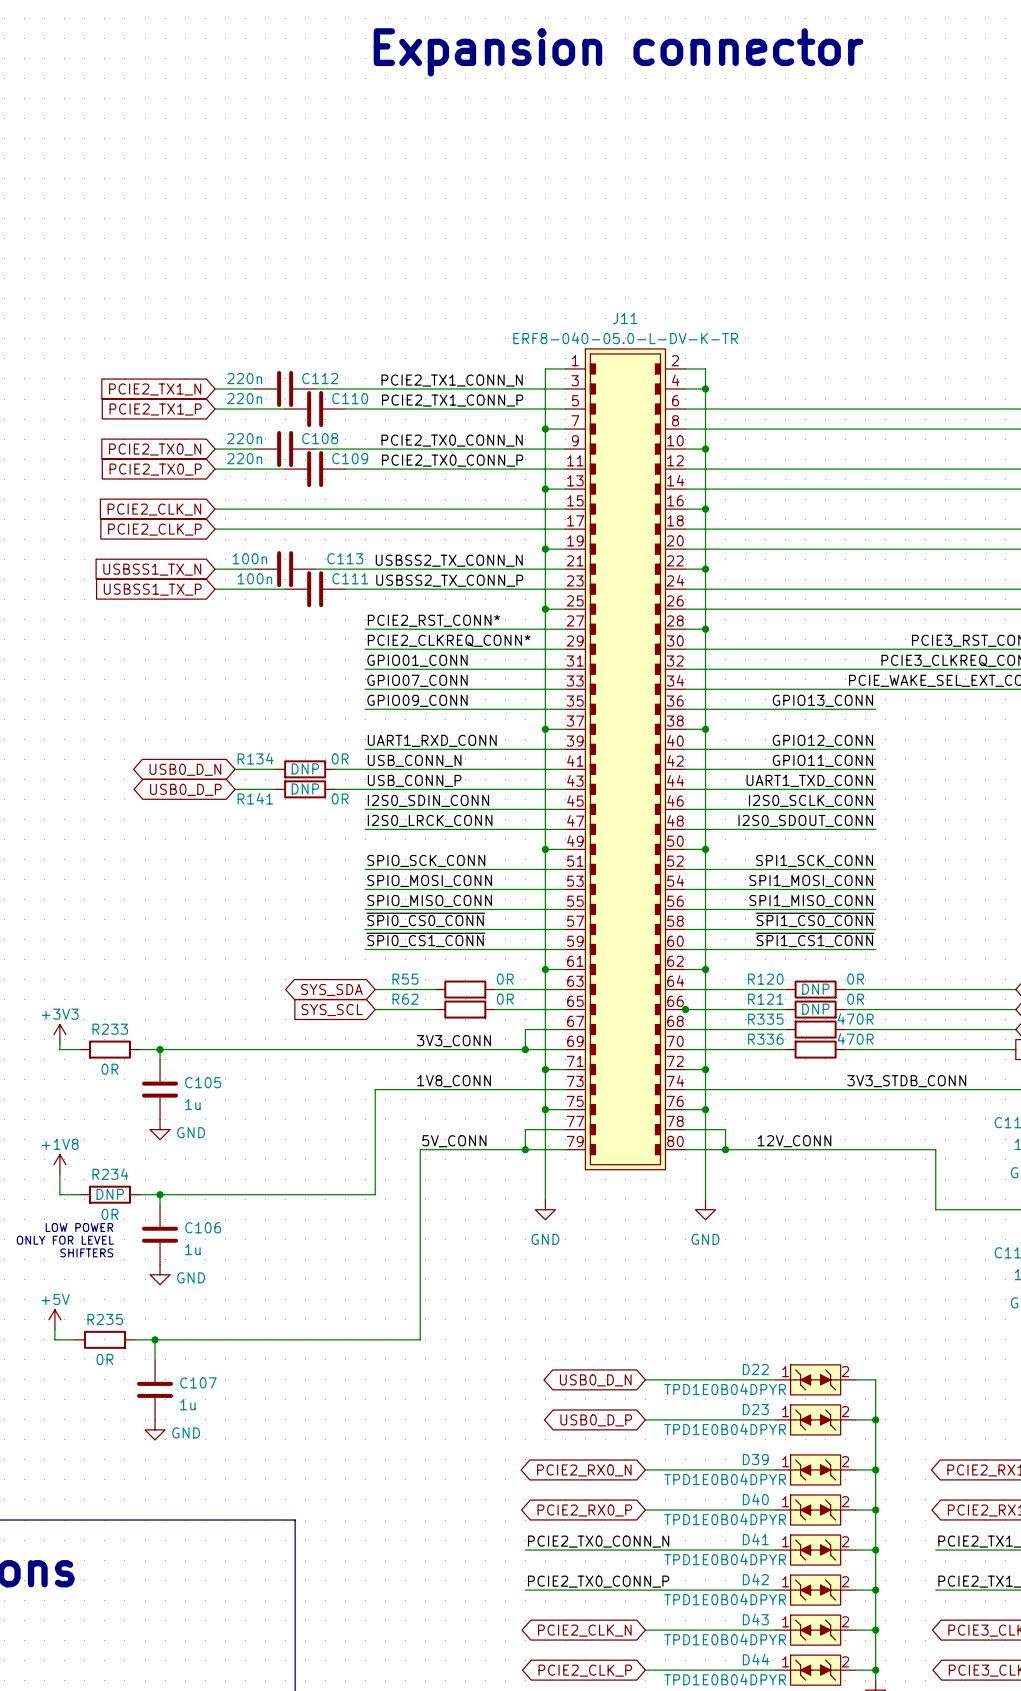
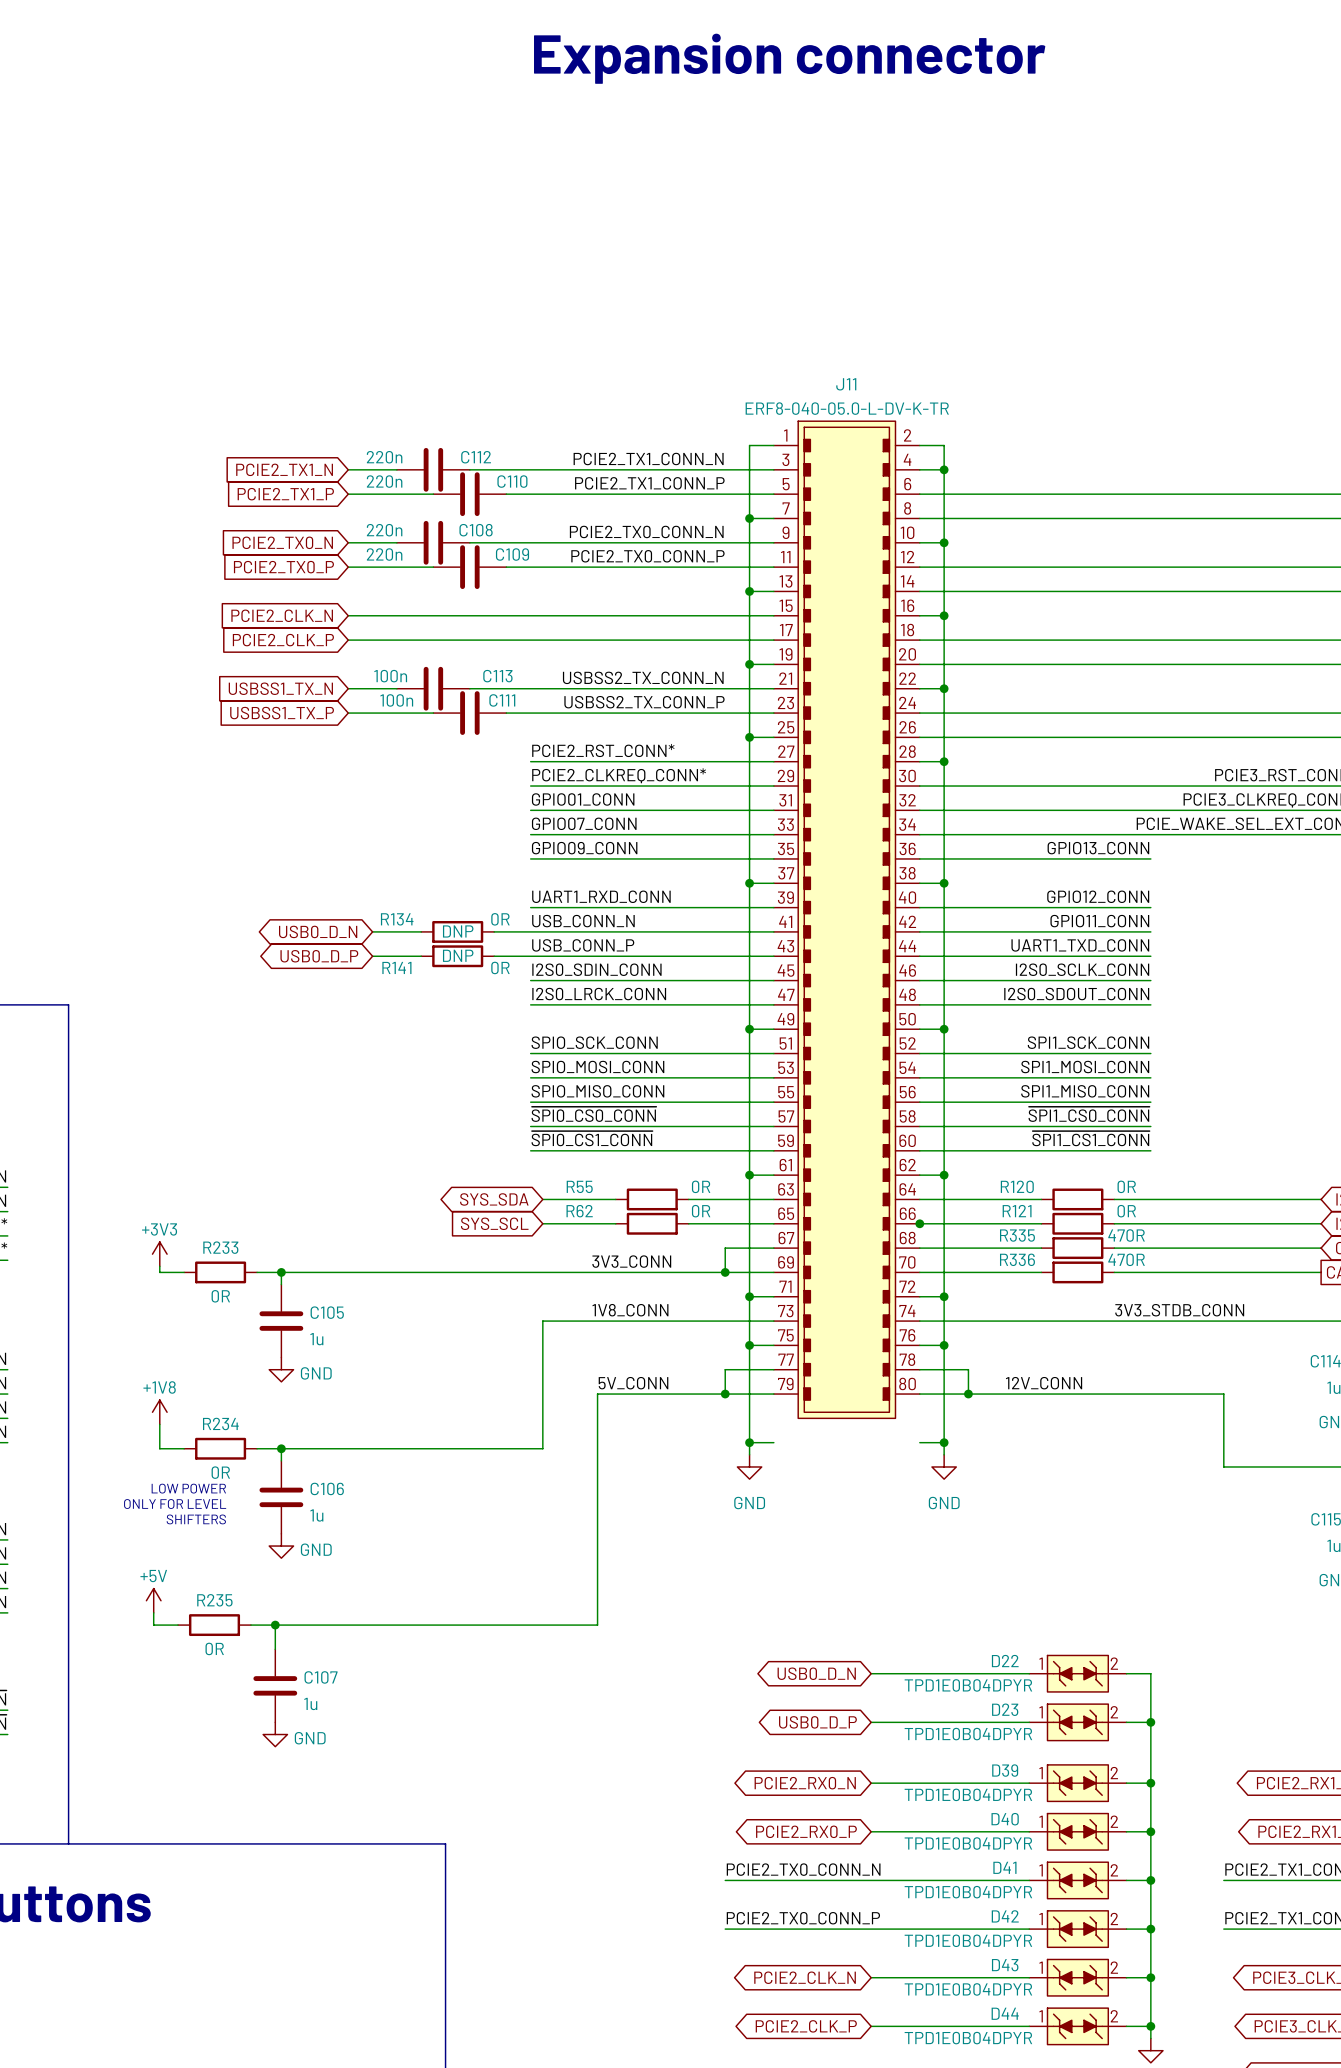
R120 text: DNP (815, 989) -> none
R121 text: DNP (815, 1009) -> none
wire: none -> (749, 1442) (773, 1442)
junction: none -> (749, 1442)
wire: none -> (919, 1442) (944, 1442)
junction: none -> (944, 1442)
R234 text: DNP (110, 1194) -> none

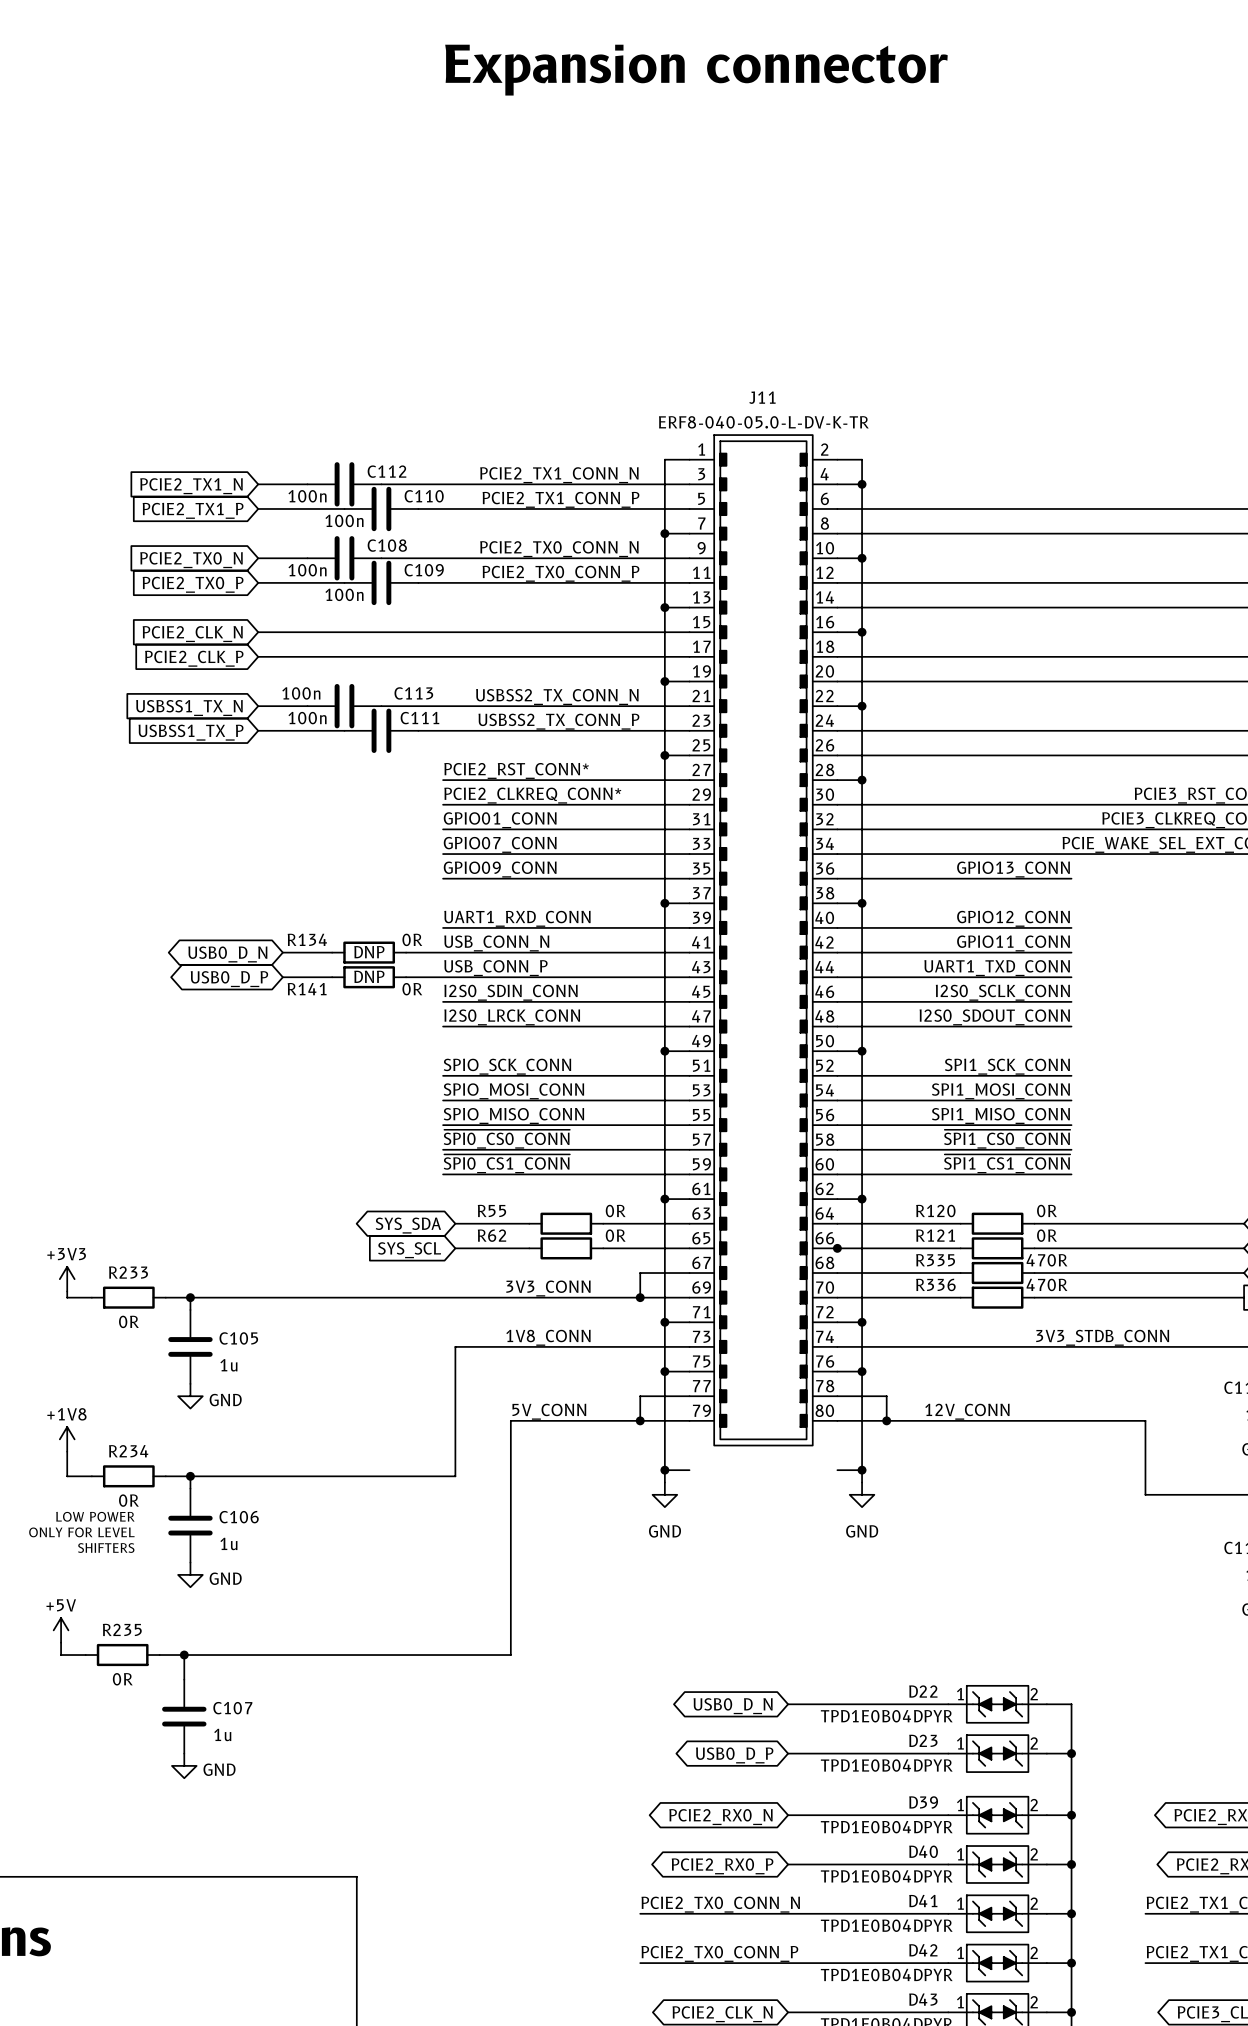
C112 text: 220n (384, 457) -> 100n (307, 496)
C110 text: 220n (384, 481) -> 100n (344, 520)
C108 text: 220n (384, 530) -> 100n (307, 570)
C109 text: 220n (384, 554) -> 100n (344, 594)

